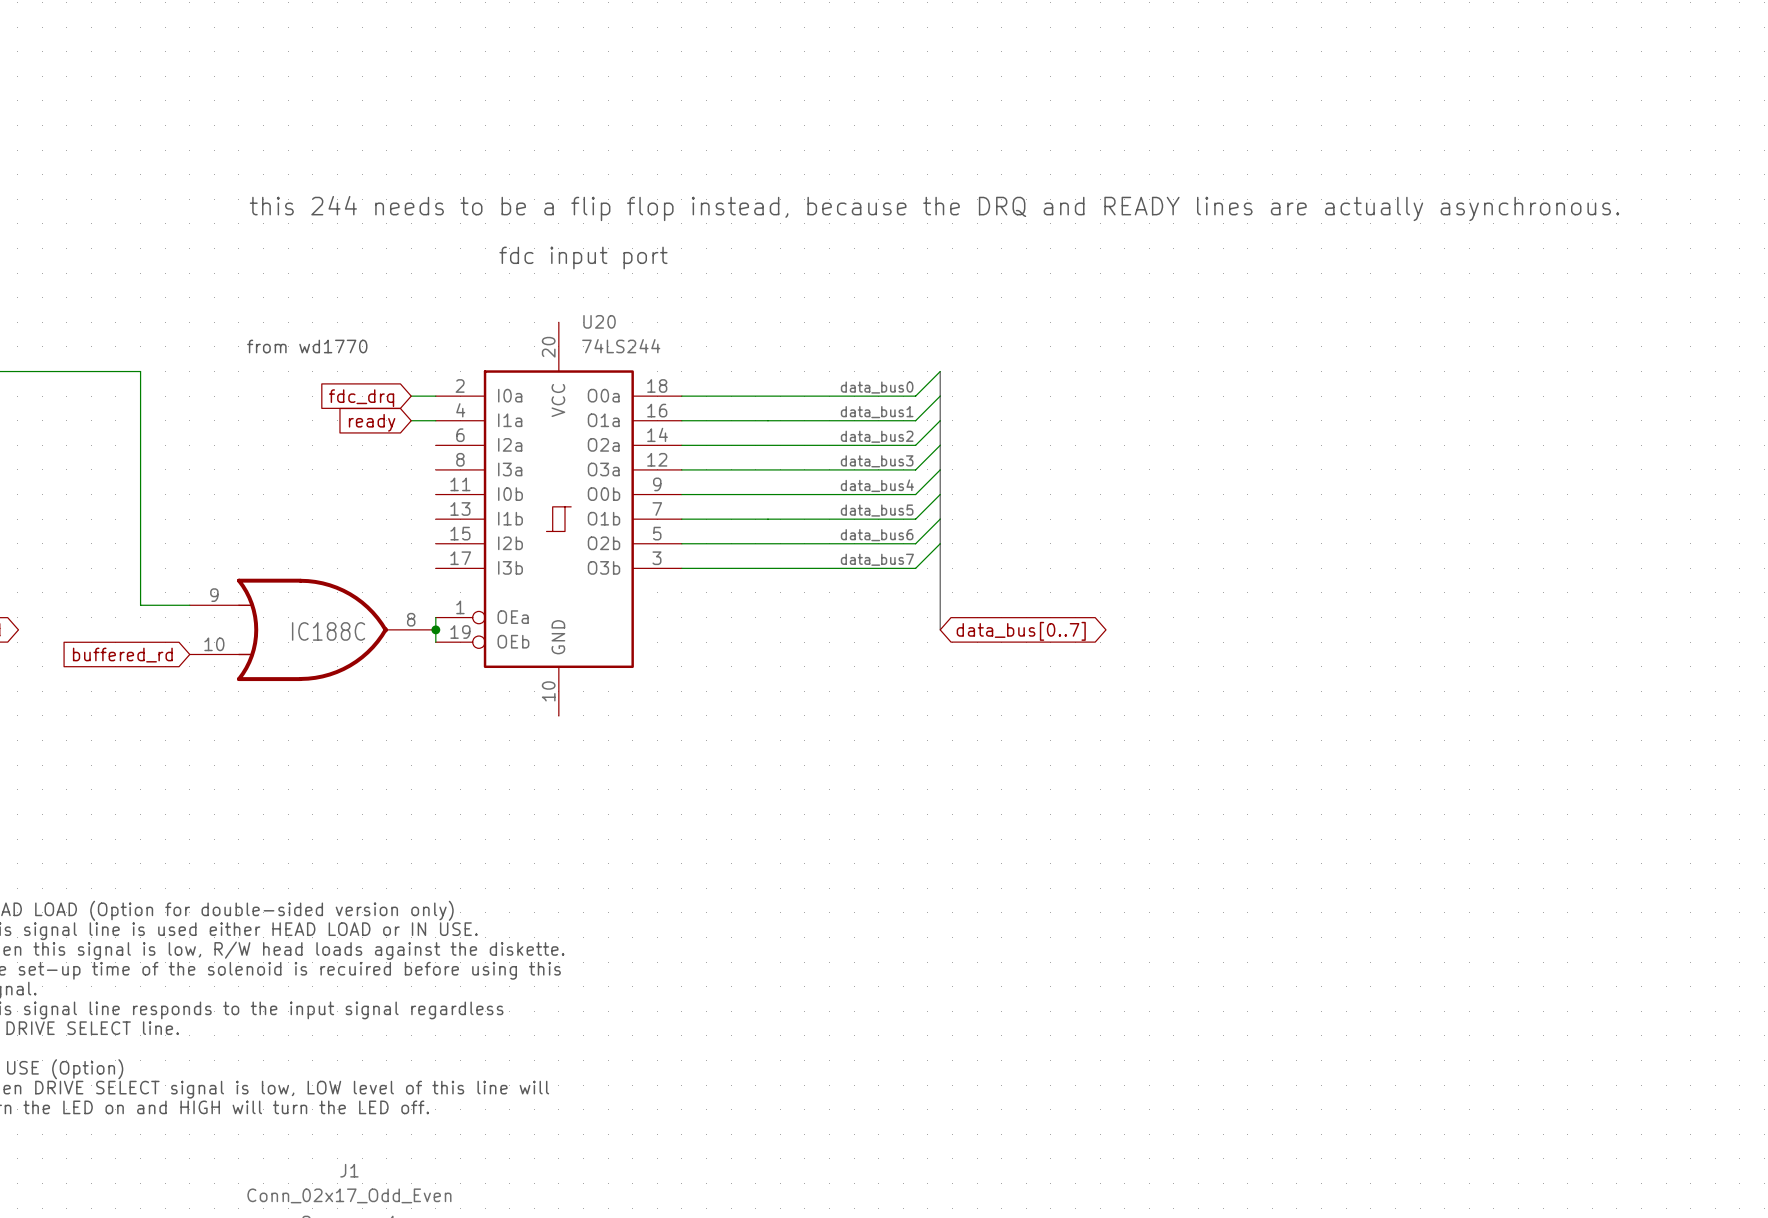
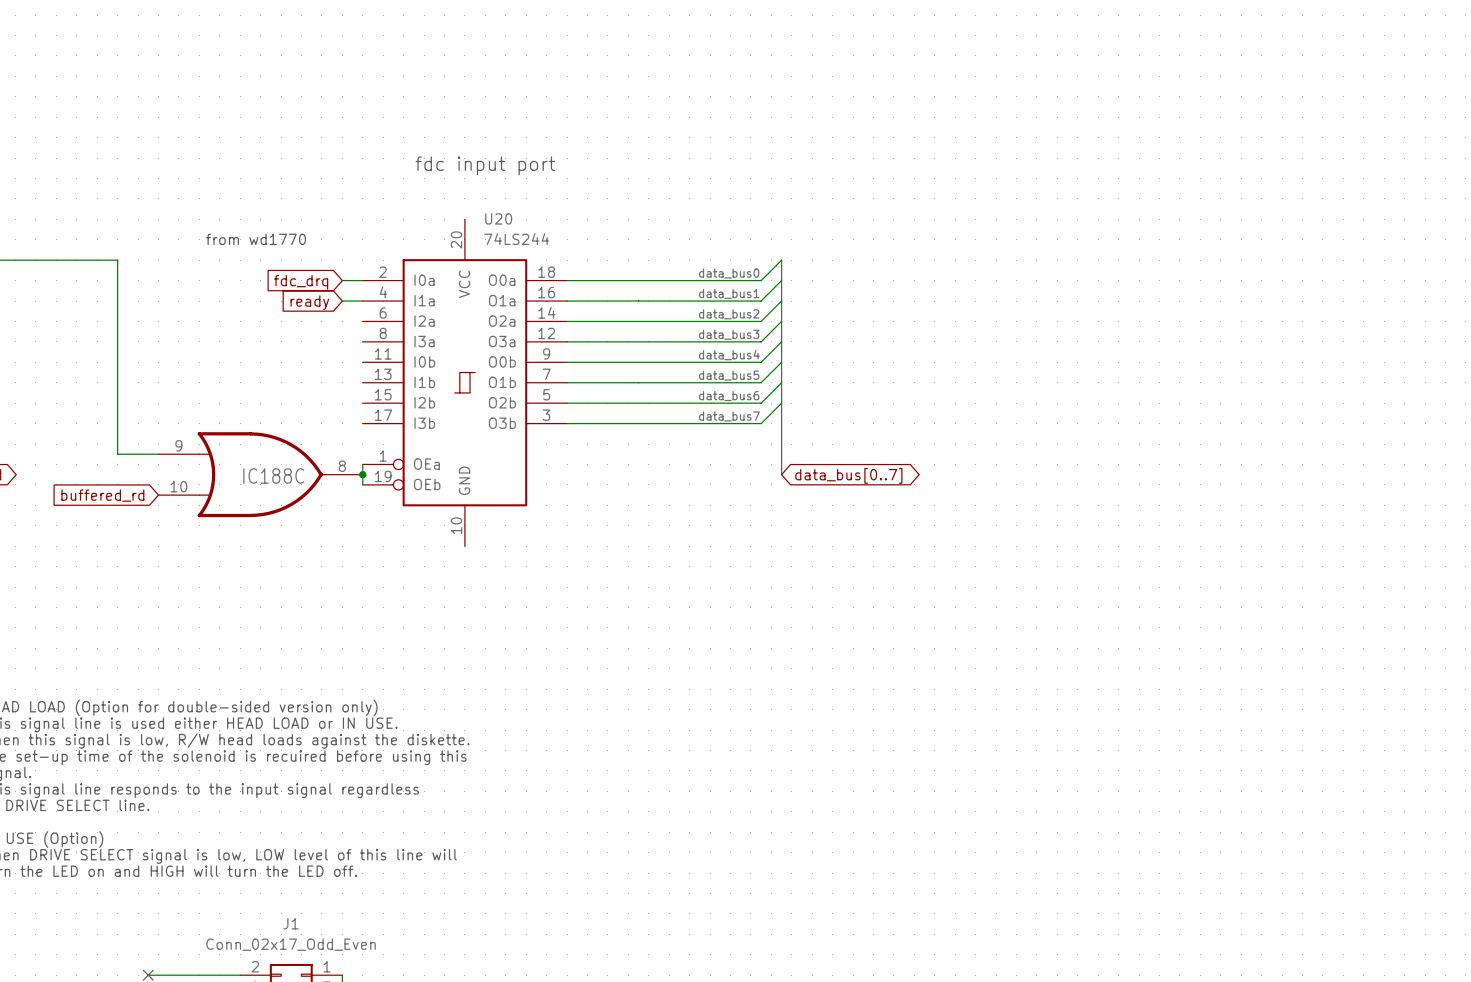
text: this 244 needs to be a flip flop instead, because the DRQ and READY lines are actually asynchronous. (934, 208) -> none

